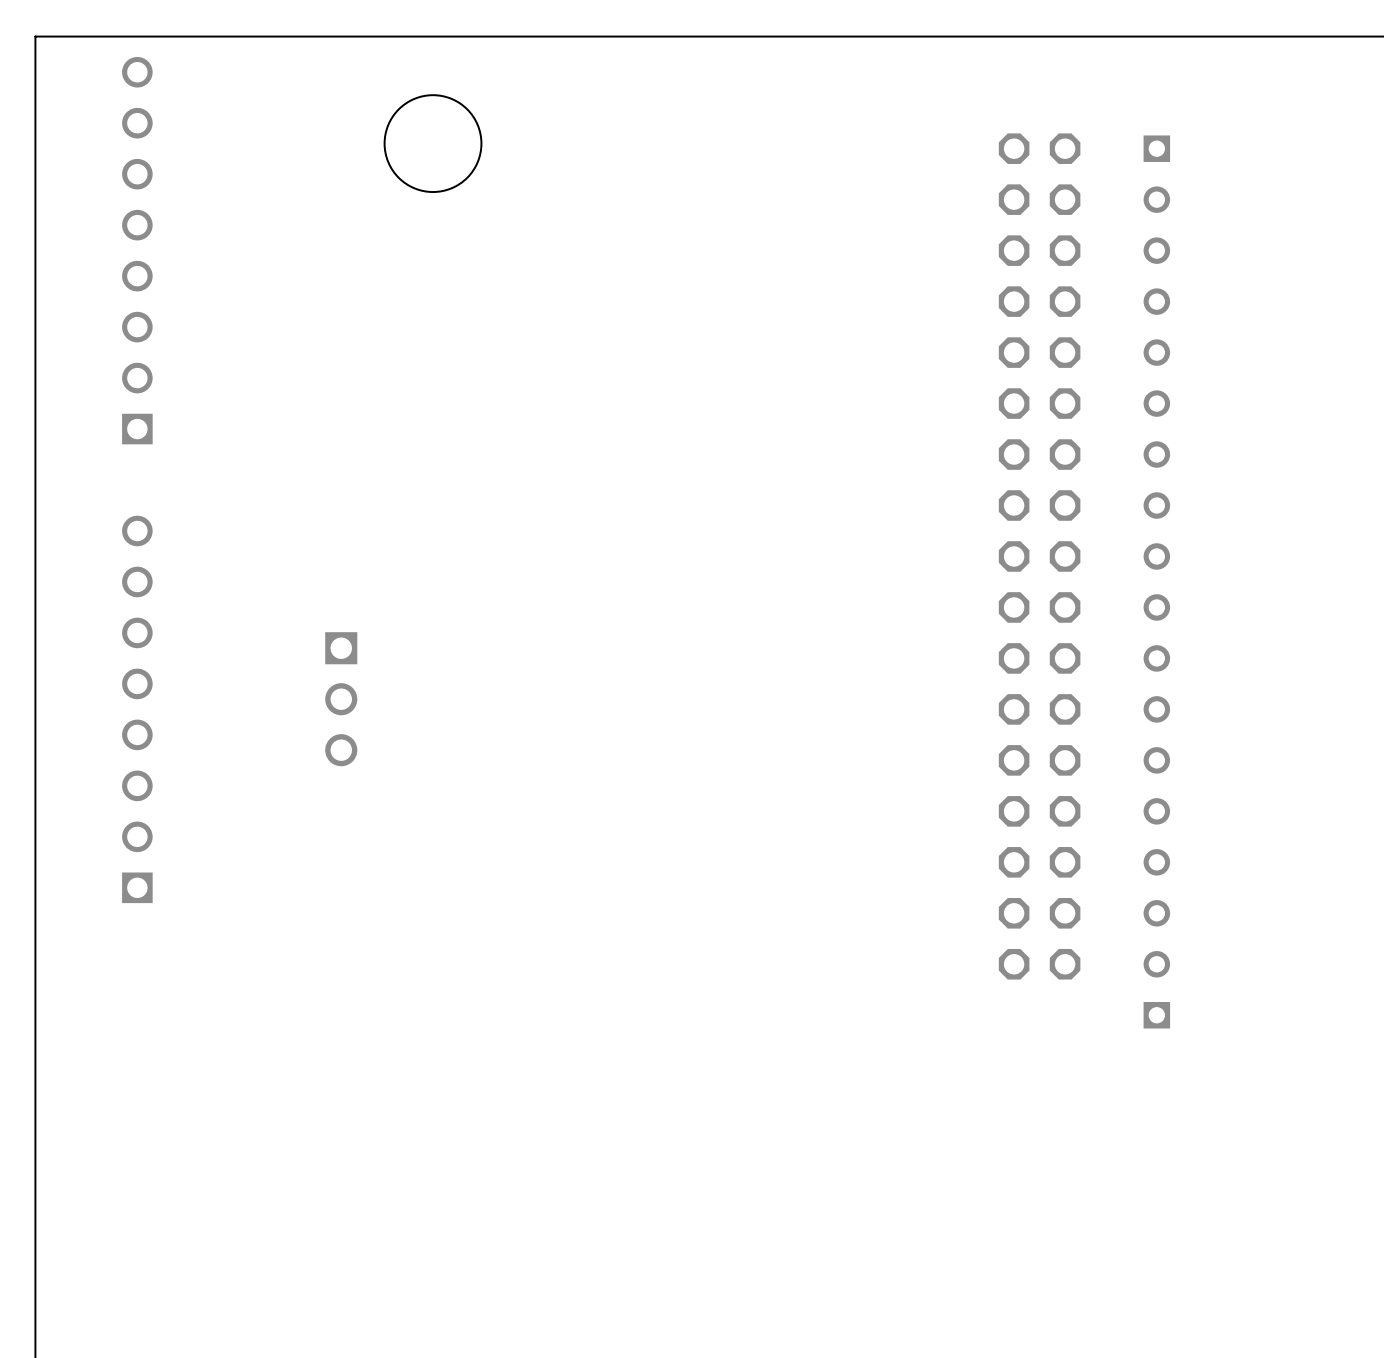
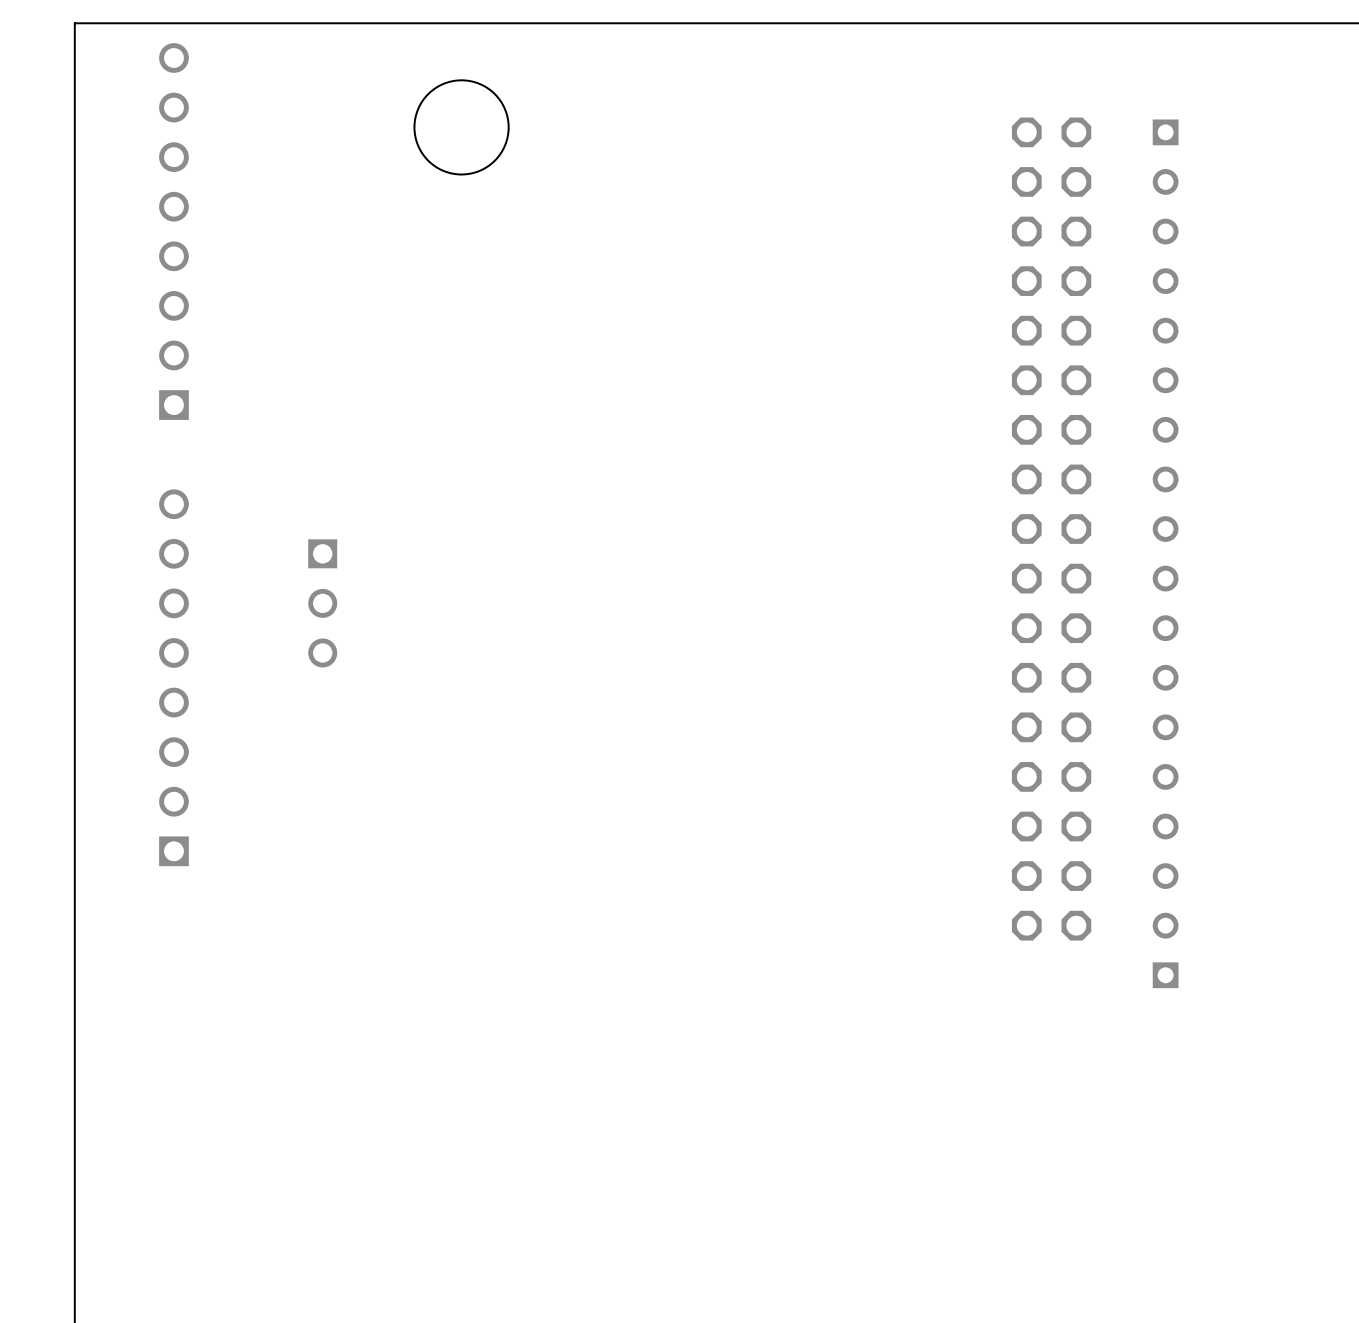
part: none -> (322, 603)
part: (341, 699) -> none

